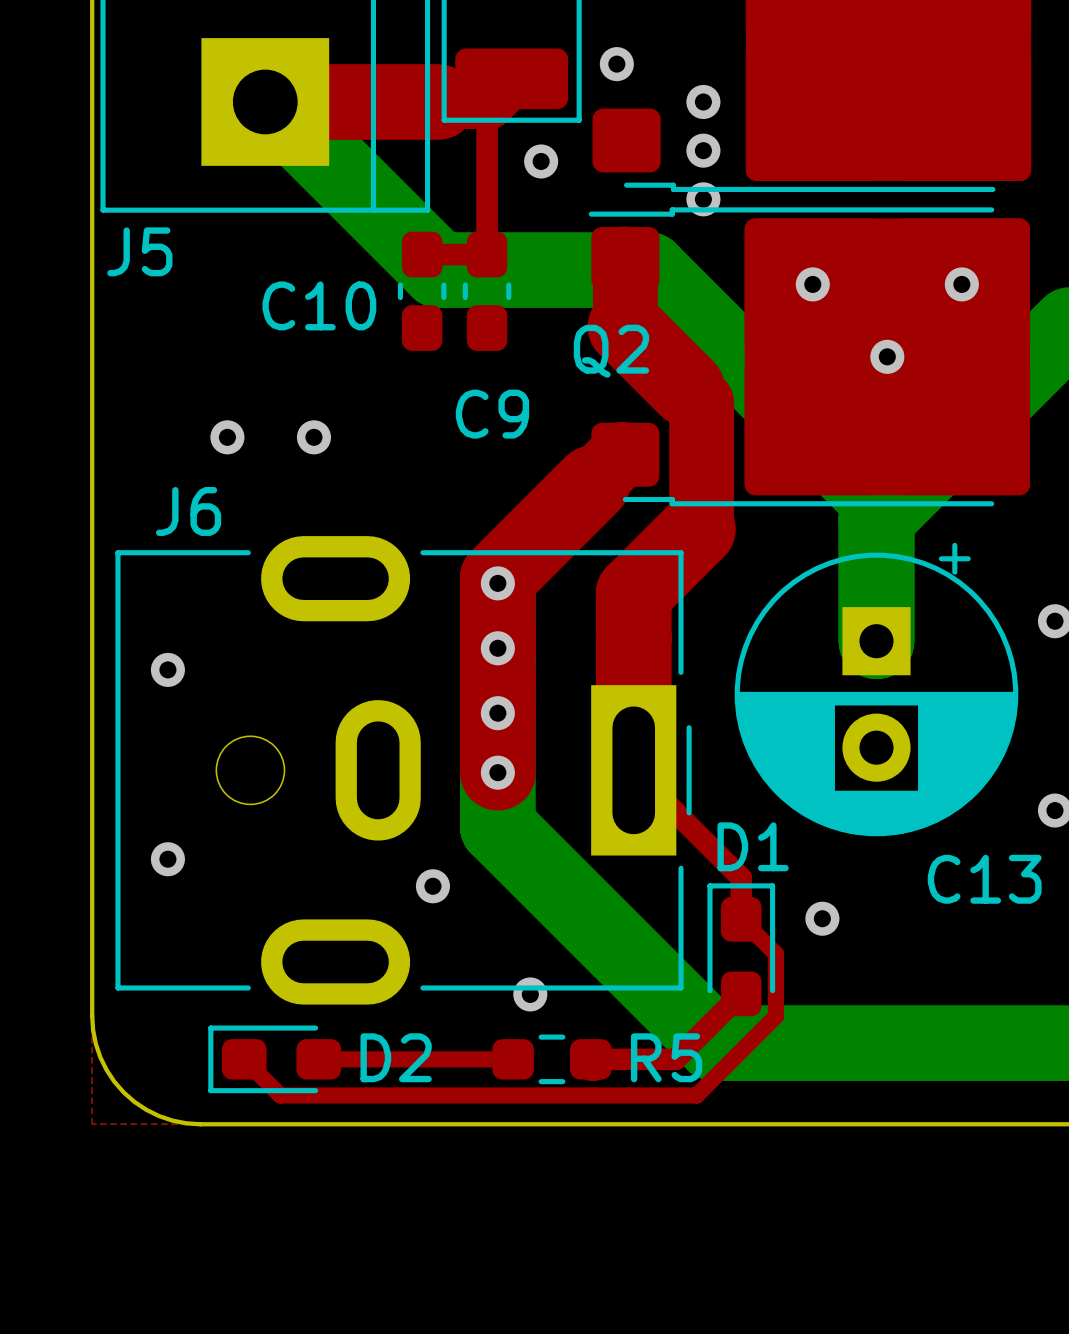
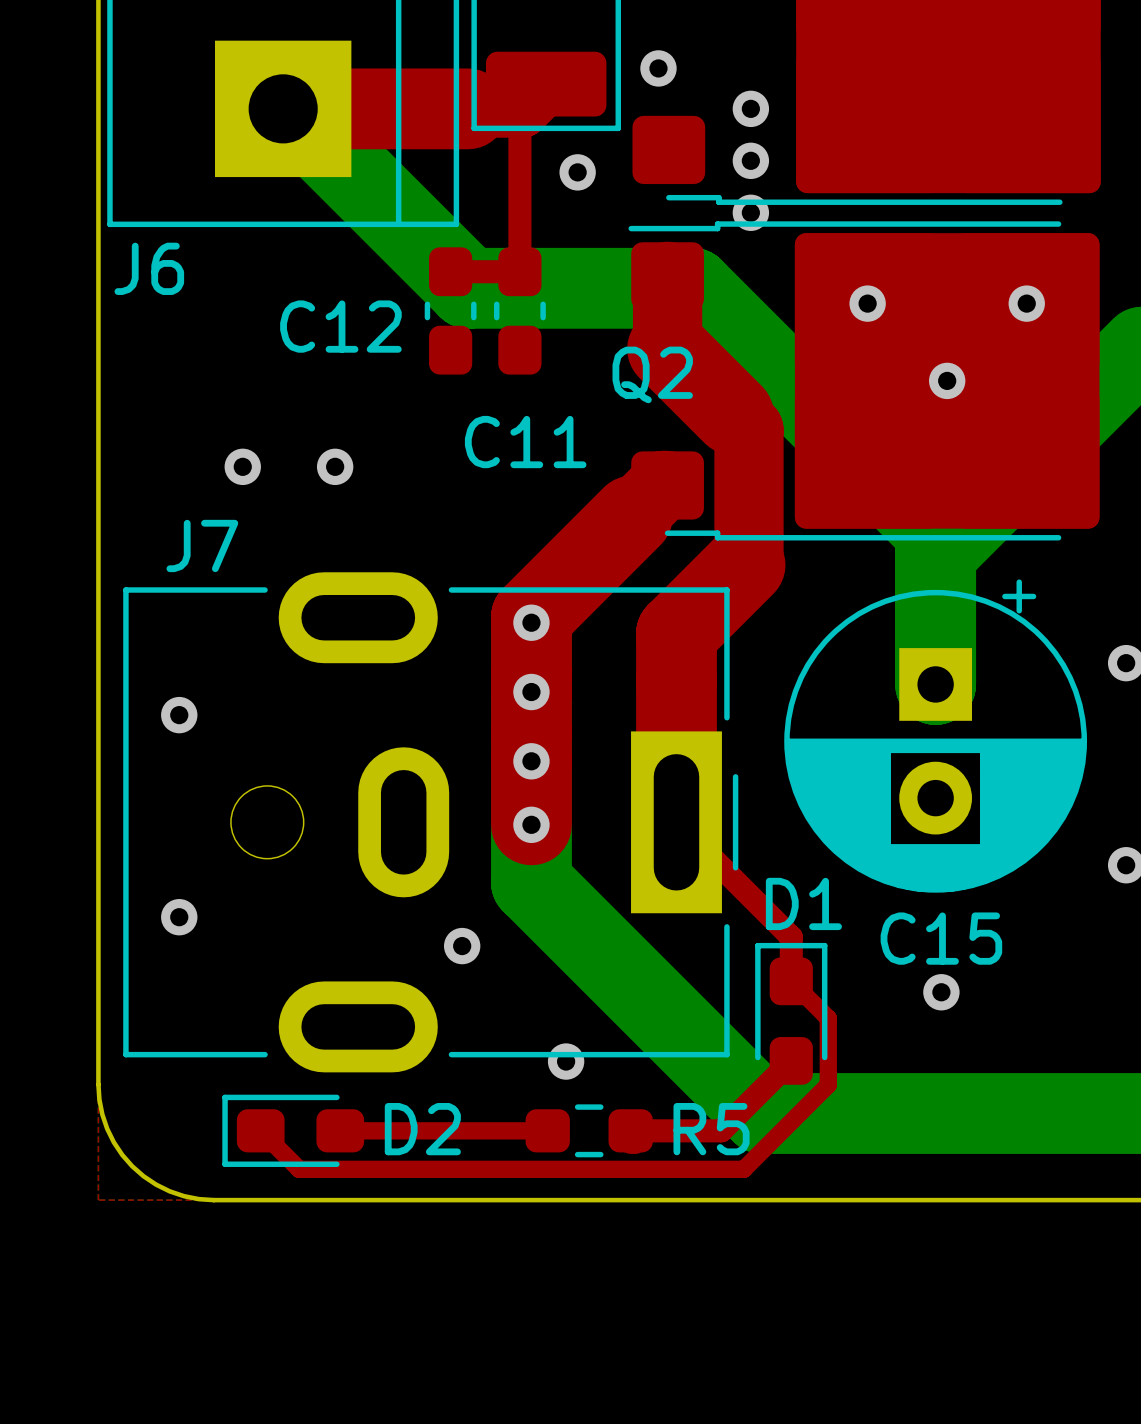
J5 name: J5 (139, 251) -> J6 (149, 268)
C10 name: C10 (319, 305) -> C12 (340, 326)
C9 name: C9 (492, 414) -> C11 (525, 442)
J6 name: J6 (188, 511) -> J7 (202, 545)
C13 name: C13 (984, 879) -> C15 (941, 938)
via position: (822, 918) -> (941, 992)

